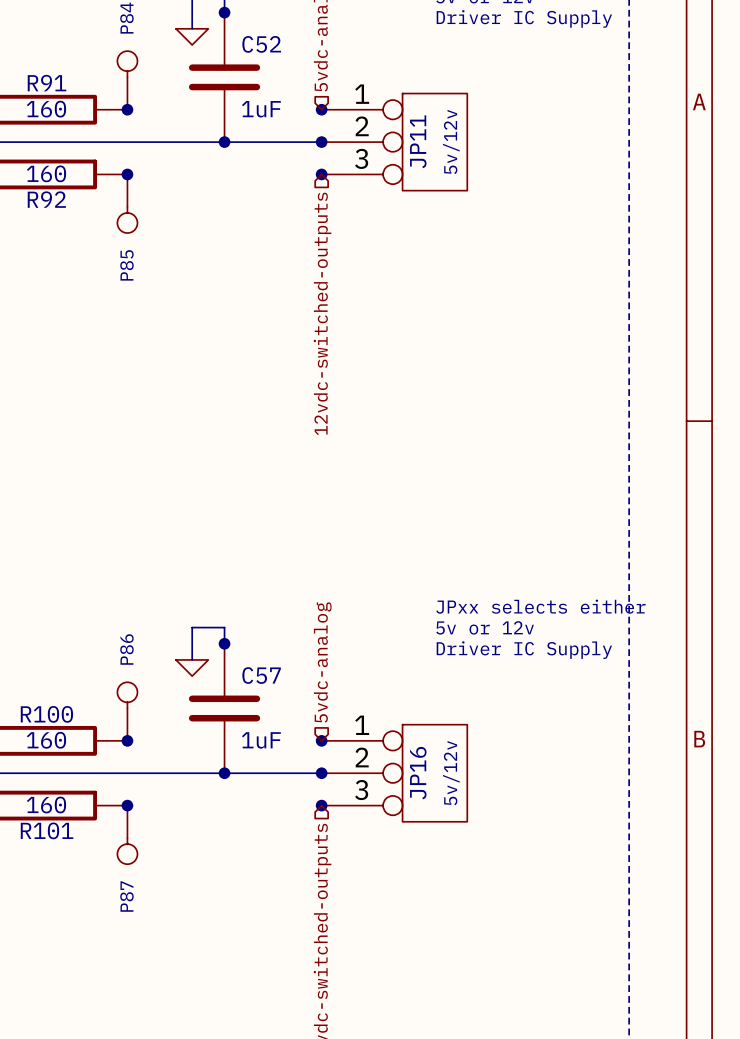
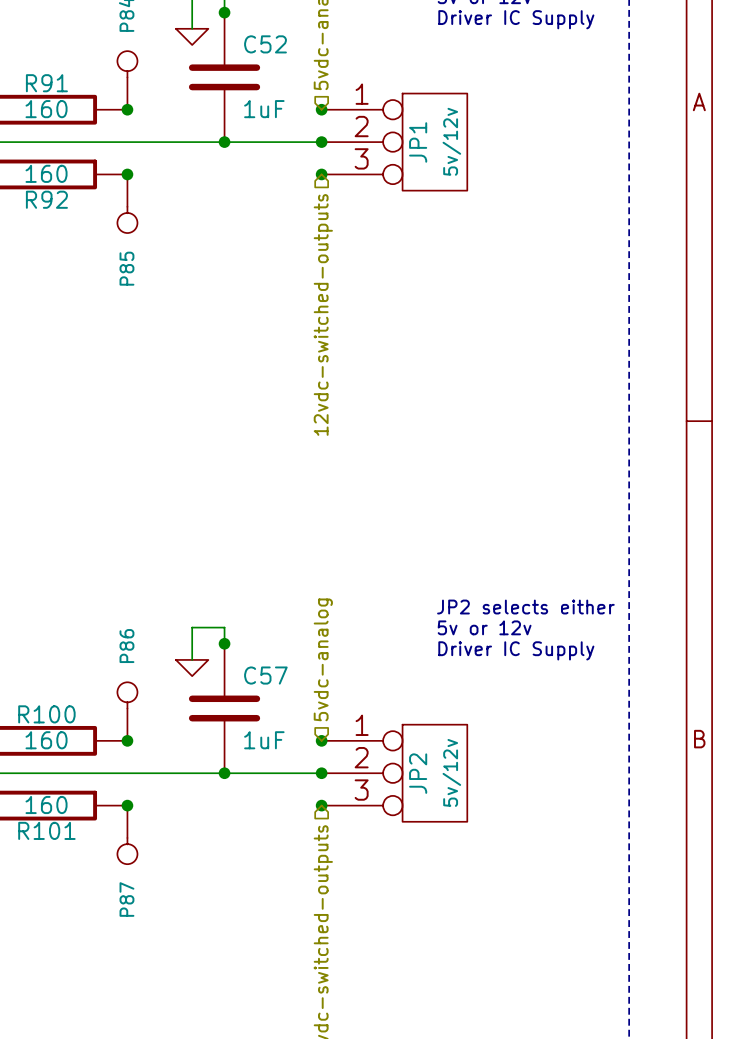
JP11 name: JP11 (418, 141) -> JP1 (418, 142)
text: JPxx selects either (540, 606) -> JP2 selects either (525, 607)
JP16 name: JP16 (418, 773) -> JP2 (418, 773)

